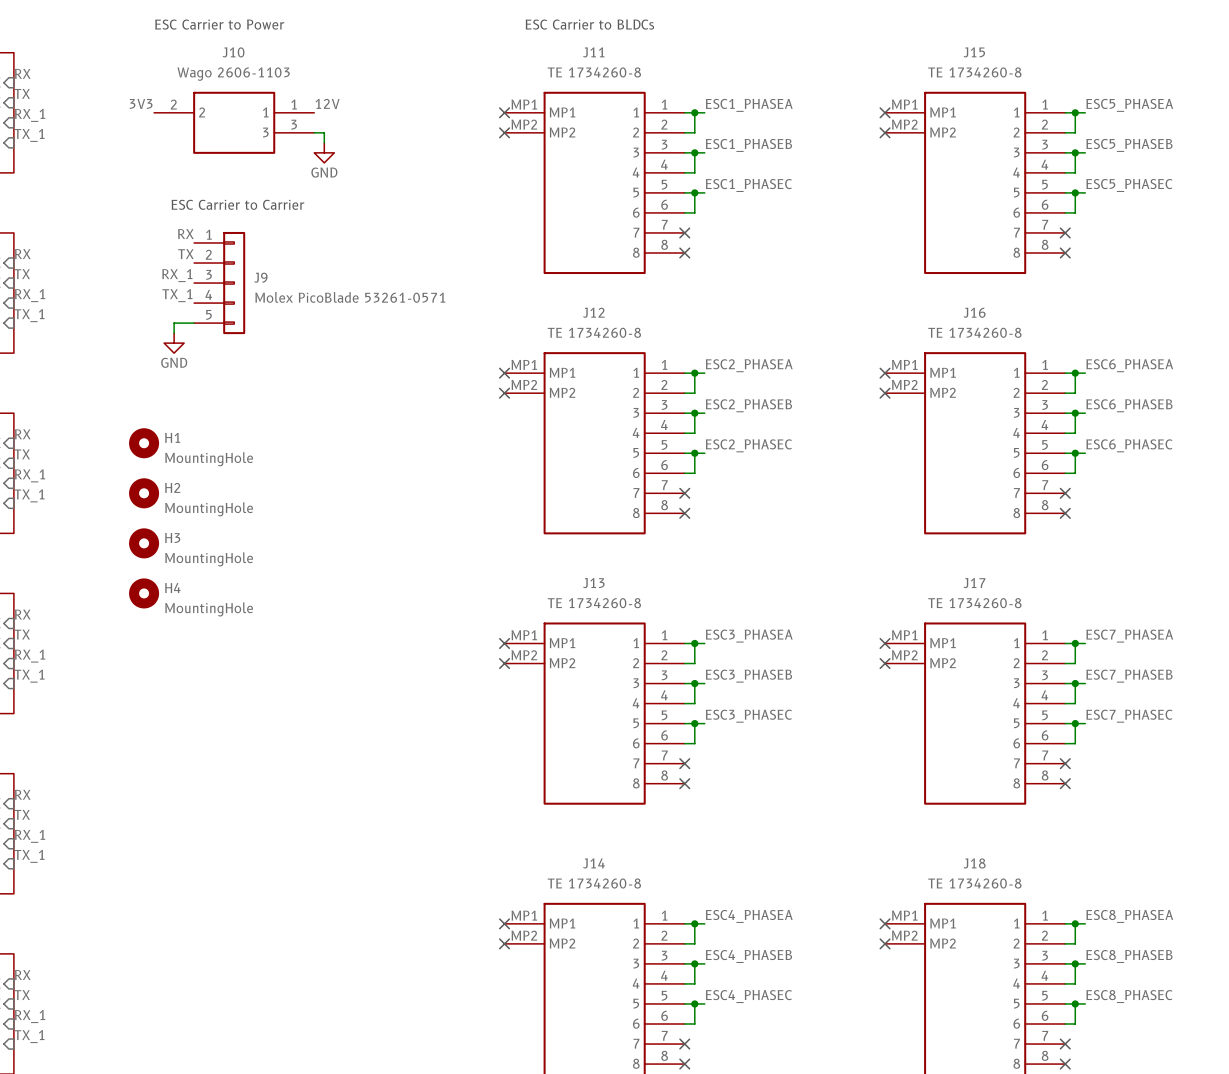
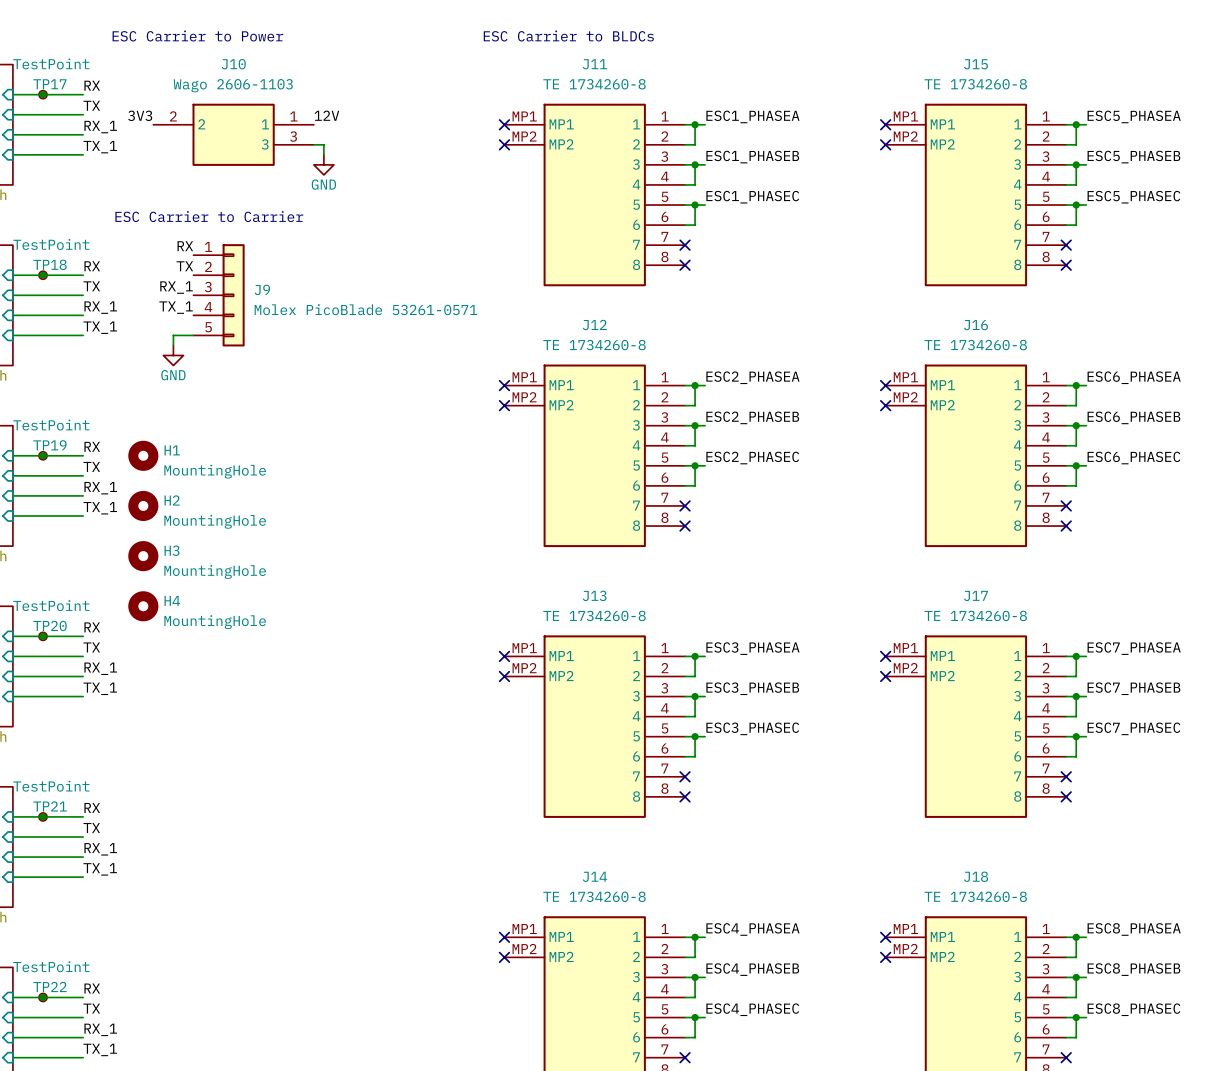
label position: RX (22, 73) -> RX (92, 85)
wire: none -> (12, 94) (83, 94)
junction: none -> (43, 94)
TP17: none -> TestPoint (43, 94)
label position: TX (22, 93) -> TX (91, 105)
wire: none -> (12, 114) (83, 114)
label position: RX_1 (30, 115) -> RX_1 (100, 127)
wire: none -> (12, 134) (83, 134)
label position: TX_1 (29, 135) -> TX_1 (100, 147)
wire: none -> (12, 154) (83, 154)
label position: RX (22, 254) -> RX (92, 266)
wire: none -> (12, 275) (83, 275)
junction: none -> (43, 275)
TP18: none -> TestPoint (43, 275)
label position: TX (22, 274) -> TX (91, 286)
wire: none -> (12, 295) (83, 295)
label position: RX_1 (30, 295) -> RX_1 (100, 307)
wire: none -> (12, 315) (83, 315)
label position: TX_1 (29, 315) -> TX_1 (100, 327)
wire: none -> (12, 335) (83, 335)
label position: RX (22, 434) -> RX (92, 446)
wire: none -> (12, 455) (83, 455)
junction: none -> (43, 455)
TP19: none -> TestPoint (43, 455)
label position: TX (22, 454) -> TX (91, 466)
wire: none -> (12, 475) (83, 475)
label position: RX_1 (30, 475) -> RX_1 (100, 488)
wire: none -> (12, 495) (83, 495)
label position: TX_1 (29, 495) -> TX_1 (100, 508)
wire: none -> (12, 515) (83, 515)
label position: RX (22, 614) -> RX (92, 627)
wire: none -> (12, 636) (83, 636)
junction: none -> (43, 636)
TP20: none -> TestPoint (43, 636)
label position: TX (22, 634) -> TX (91, 647)
wire: none -> (12, 656) (83, 656)
label position: RX_1 (30, 656) -> RX_1 (100, 668)
wire: none -> (12, 676) (83, 676)
label position: TX_1 (29, 676) -> TX_1 (100, 688)
wire: none -> (12, 696) (83, 696)
label position: RX (22, 794) -> RX (92, 807)
wire: none -> (12, 816) (83, 816)
junction: none -> (43, 816)
TP21: none -> TestPoint (43, 816)
label position: TX (22, 814) -> TX (91, 828)
wire: none -> (12, 836) (83, 836)
label position: RX_1 (30, 836) -> RX_1 (100, 849)
wire: none -> (12, 857) (83, 857)
label position: TX_1 (29, 856) -> TX_1 (100, 869)
wire: none -> (12, 877) (83, 877)
label position: RX (22, 975) -> RX (92, 988)
wire: none -> (12, 997) (83, 997)
junction: none -> (43, 997)
TP22: none -> TestPoint (43, 997)
label position: TX (22, 995) -> TX (91, 1008)
wire: none -> (12, 1017) (83, 1017)
label position: RX_1 (30, 1016) -> RX_1 (100, 1029)
wire: none -> (12, 1037) (83, 1037)
label position: TX_1 (29, 1036) -> TX_1 (100, 1049)
wire: none -> (12, 1057) (83, 1057)

